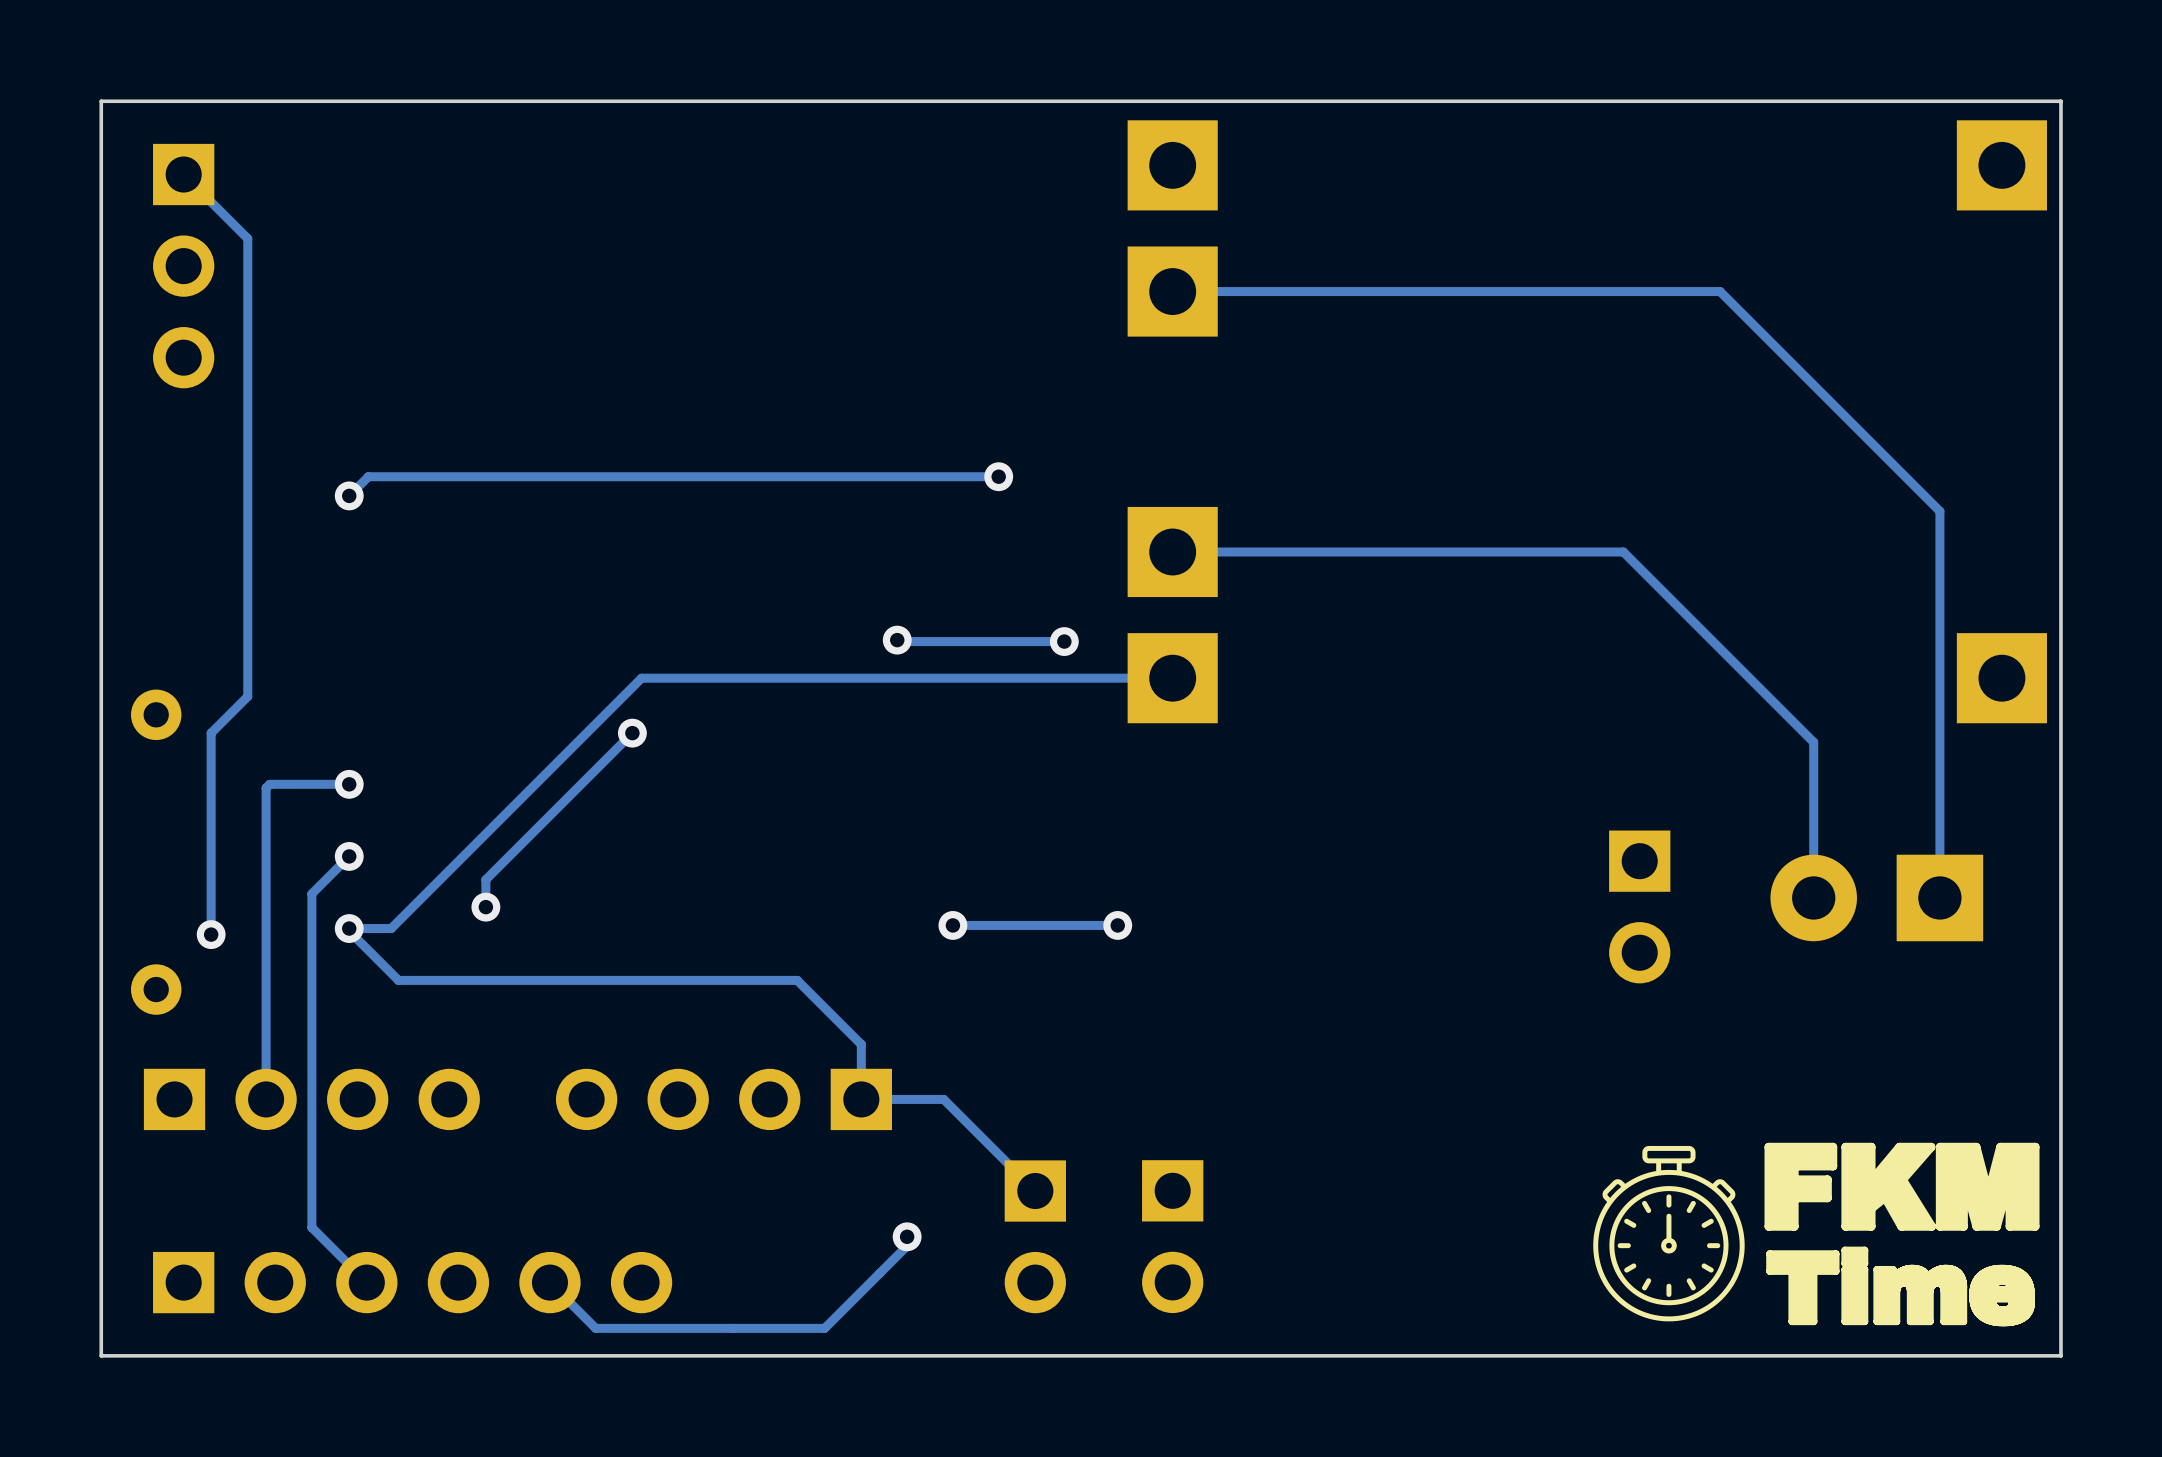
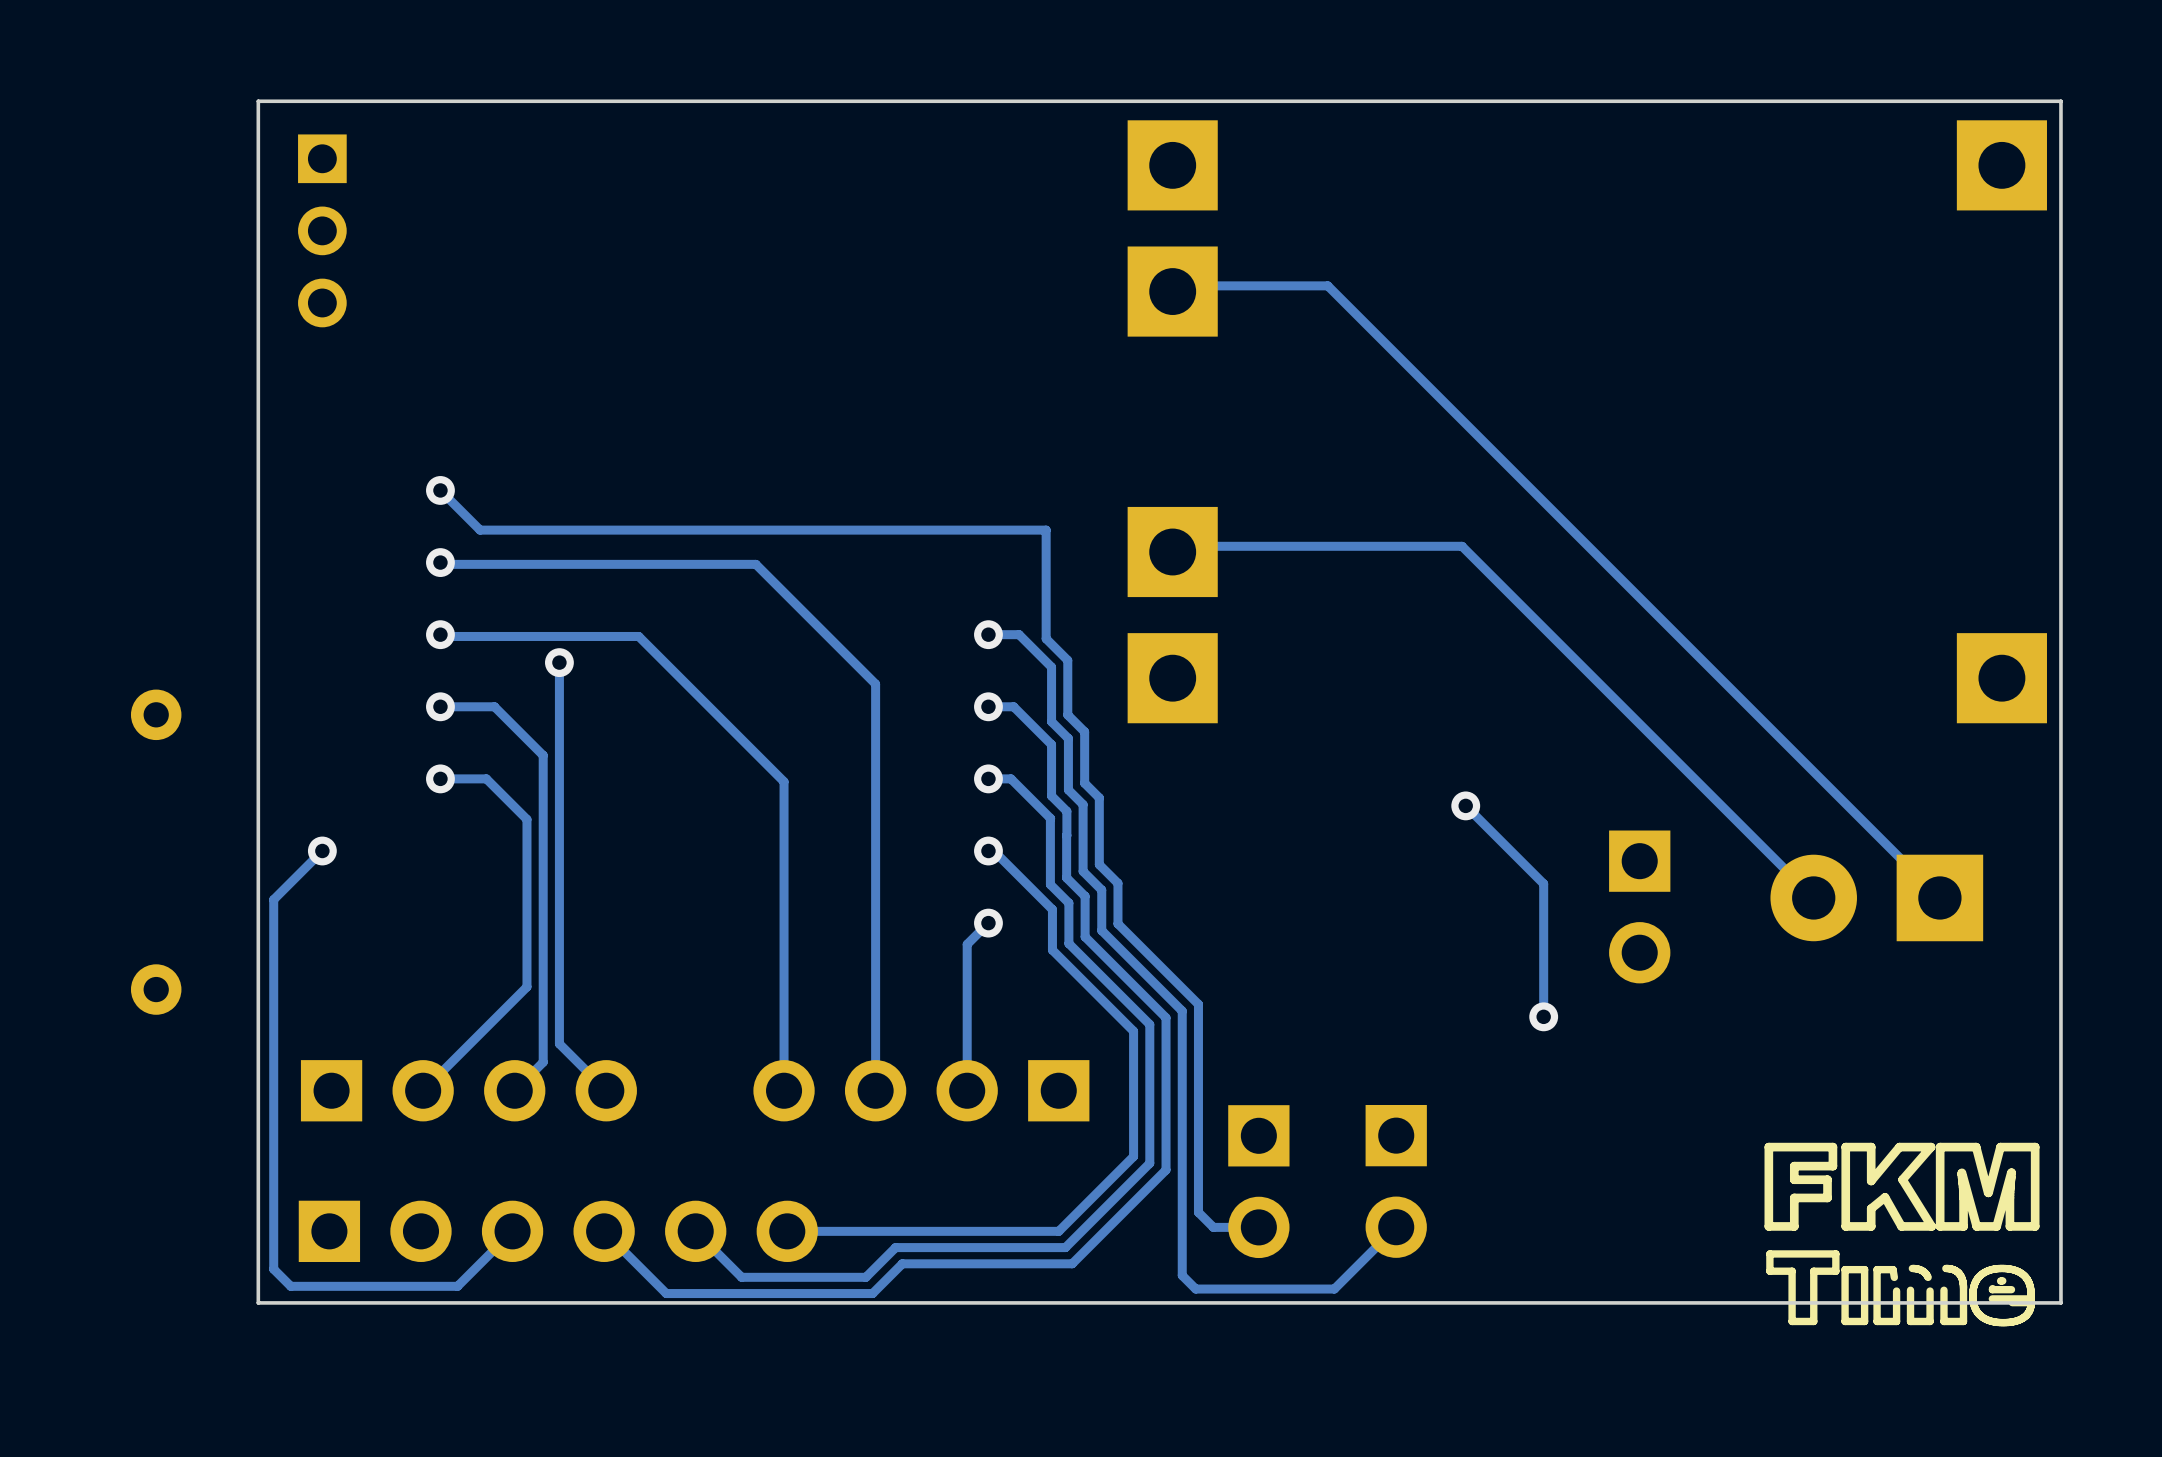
board edge: (258, 101) (101, 101) (101, 1355) (2060, 1355) (2060, 1302) -> (258, 101) (258, 1302) (2060, 1302)
track: (183, 174) (247, 238) (247, 696) (211, 733) (211, 934) -> none
part: none -> (322, 230)
part: (183, 266) -> none
track: (1172, 291) (1720, 291) (1939, 511) (1939, 897) -> (1172, 285) (1327, 285) (1939, 897)
track: (998, 476) (368, 476) (349, 495) -> none
via: (998, 476) -> none
track: none -> (440, 490) (480, 530) (1046, 530) (1046, 638) (1067, 660) (1067, 714) (1084, 731) (1084, 783) (1099, 797) (1099, 864) (1117, 883) (1117, 923) (1198, 1004) (1198, 1212) (1213, 1227) (1258, 1227)
via: none -> (440, 490)
via: (349, 495) -> none
track: (1172, 552) (1623, 552) (1813, 742) (1813, 897) -> (1172, 546) (1462, 546) (1813, 897)
track: none -> (440, 562) (442, 564) (755, 564) (875, 684) (875, 1090)
via: none -> (440, 562)
track: none -> (440, 634) (442, 636) (638, 636) (784, 781) (784, 1090)
via: none -> (440, 634)
track: none -> (988, 634) (1019, 634) (1051, 667) (1051, 721) (1068, 738) (1068, 789) (1083, 804) (1083, 871) (1101, 890) (1101, 930) (1182, 1011) (1182, 1275) (1195, 1289) (1334, 1289) (1396, 1227)
via: none -> (988, 634)
track: (897, 640) (1064, 641) -> none
via: (897, 640) -> none
via: (1064, 641) -> none
track: none -> (559, 662) (559, 1043) (606, 1090)
via: none -> (559, 662)
track: (1172, 678) (641, 678) (391, 928) (349, 928) (349, 931) (398, 980) (797, 980) (861, 1044) (861, 1099) (943, 1099) (1035, 1191) -> none
track: none -> (440, 706) (494, 706) (543, 755) (543, 1062) (514, 1090)
via: none -> (440, 706)
track: none -> (988, 706) (1013, 706) (1051, 744) (1051, 796) (1066, 811) (1066, 877) (1085, 896) (1085, 936) (1166, 1017) (1166, 1169) (1072, 1263) (902, 1263) (872, 1293) (666, 1293) (604, 1231)
via: none -> (988, 706)
track: (632, 733) (485, 879) (485, 907) -> none
via: (632, 733) -> none
track: none -> (440, 778) (486, 778) (526, 819) (526, 986) (423, 1090)
via: none -> (440, 778)
track: none -> (988, 778) (1011, 778) (1050, 818) (1050, 884) (1068, 903) (1068, 943) (1149, 1024) (1149, 1163) (1065, 1247) (895, 1247) (865, 1277) (741, 1277) (695, 1231)
via: none -> (988, 778)
track: (349, 784) (269, 784) (266, 788) (266, 1099) -> none
via: (349, 784) -> none
track: none -> (1465, 805) (1543, 883) (1543, 1016)
via: none -> (1465, 805)
track: none -> (322, 850) (273, 899) (273, 1269) (290, 1286) (457, 1286) (512, 1231)
track: none -> (988, 850) (993, 850) (1052, 909) (1052, 950) (1133, 1031) (1133, 1156) (1058, 1231) (787, 1231)
via: none -> (988, 850)
track: (349, 856) (311, 893) (311, 1227) (366, 1282) -> none
via position: (349, 856) -> (322, 850)
via: (485, 907) -> none
track: none -> (988, 923) (967, 944) (967, 1090)
via position: (952, 925) -> (988, 923)
track: (1117, 925) (952, 925) -> none
via: (1117, 925) -> none
via: (349, 928) -> none
via: (211, 934) -> none
via: none -> (1543, 1016)
part: none -> (468, 1090)
part: none -> (921, 1090)
part: (311, 1099) -> none
part: (723, 1099) -> none
drawing: [1593, 1145, 2036, 1323] -> none
part: none -> (1396, 1181)
track: (907, 1236) (907, 1245) (824, 1328) (595, 1328) (549, 1282) -> none
via: (907, 1236) -> none
part: (1035, 1236) -> none
part position: (1172, 1236) -> (1258, 1181)
line: (1864, 1250) (1845, 1250) (1845, 1263) (1864, 1263) (1864, 1250) -> none
part position: (412, 1282) -> (558, 1231)

